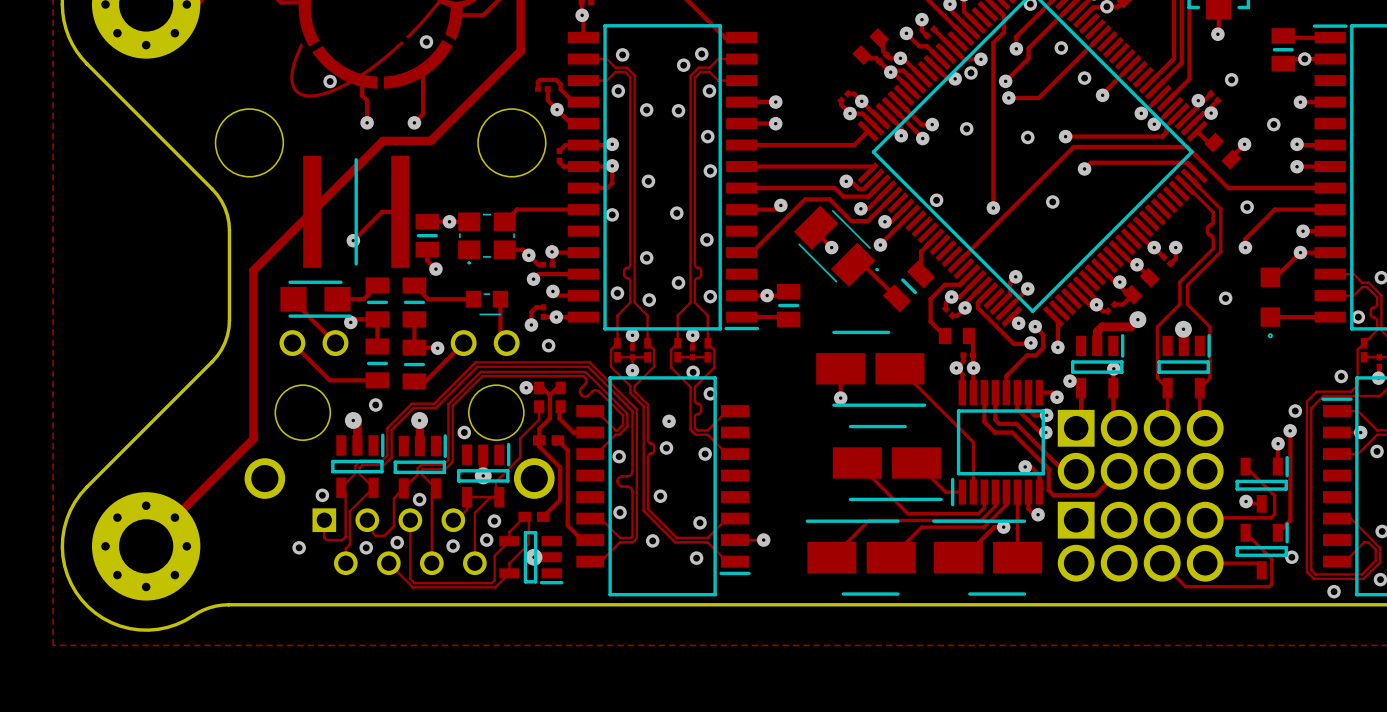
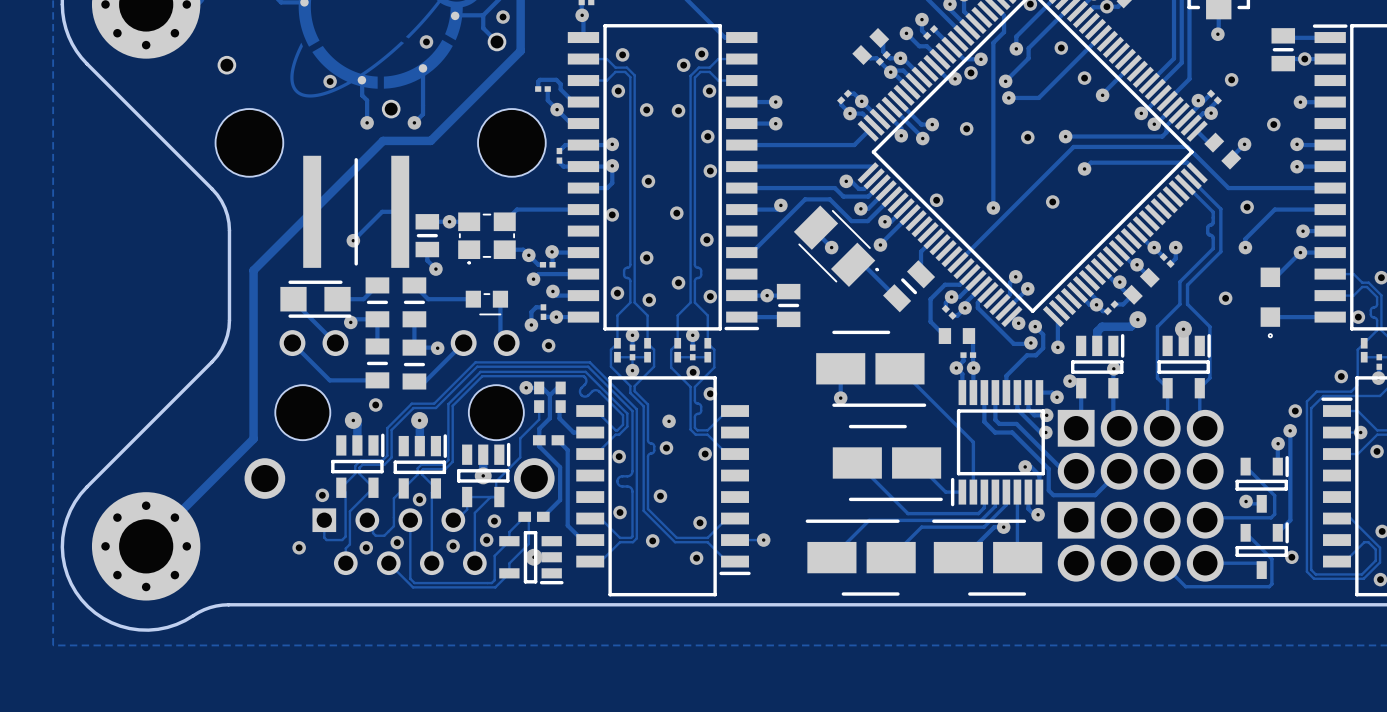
track: none -> (483, 15) (483, 28) (497, 41)
via: none -> (503, 17)
part: none -> (497, 41)
part: none -> (226, 65)
part: none -> (391, 109)
via: (464, 432) -> none
via: (1334, 591) -> none

